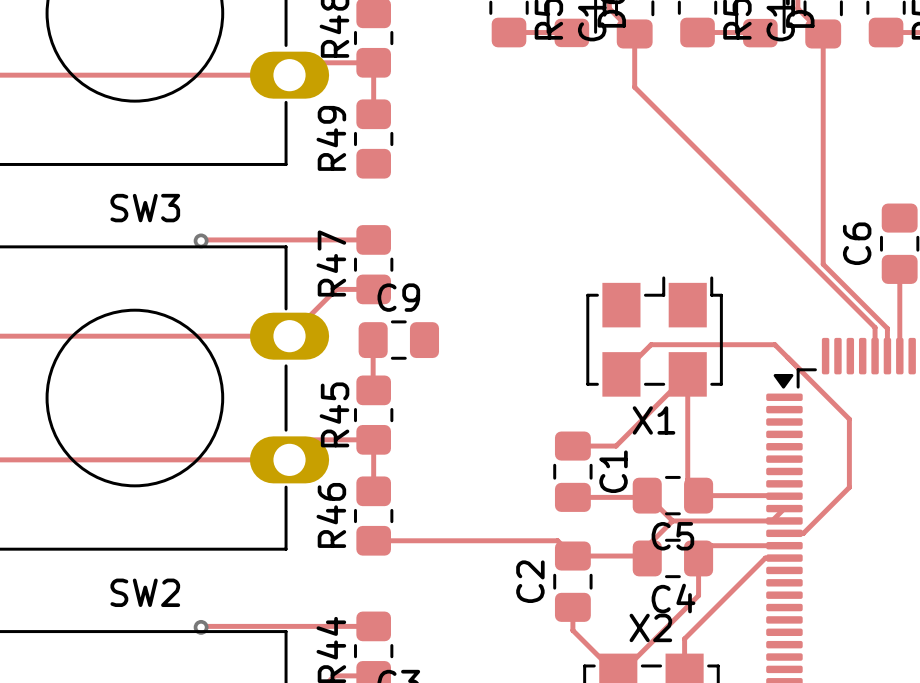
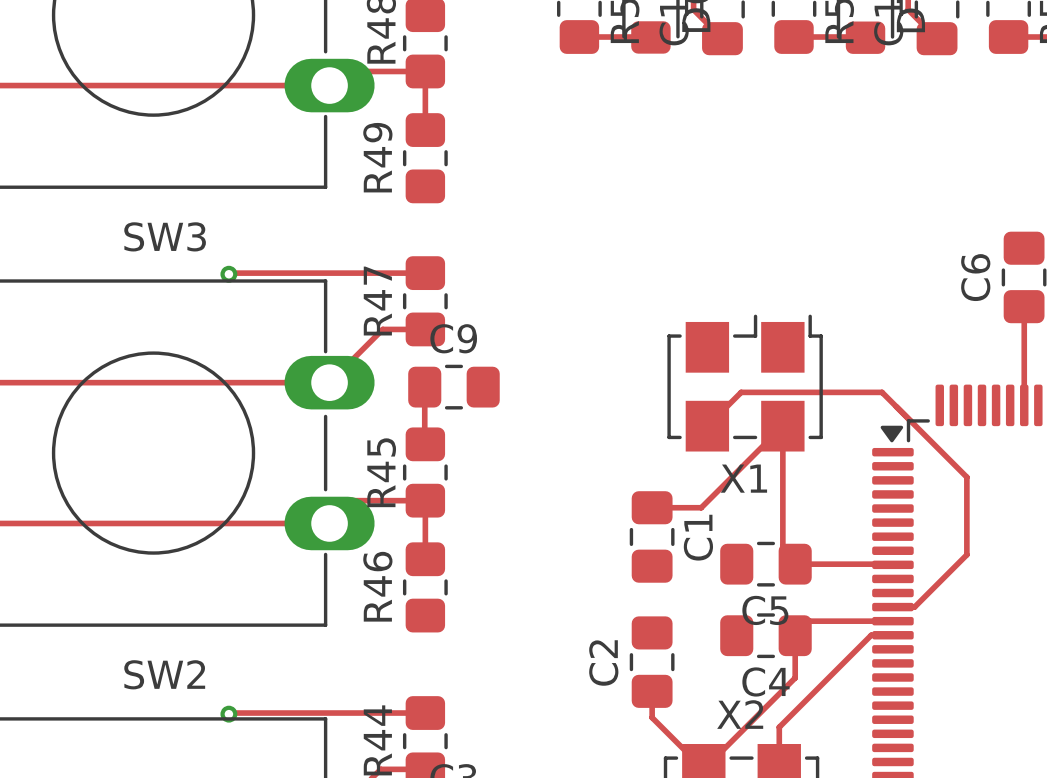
track: (634, 33) (634, 87) (875, 327) (875, 356) -> none
track: (823, 33) (823, 264) (887, 328) (887, 356) -> none
track: (572, 497) (645, 497) (647, 495) (672, 520) -> none
track: (784, 508) (772, 520) (672, 520) -> none
track: (672, 520) (647, 546) (647, 558) (644, 556) (572, 556) (557, 540) (373, 540) -> none

